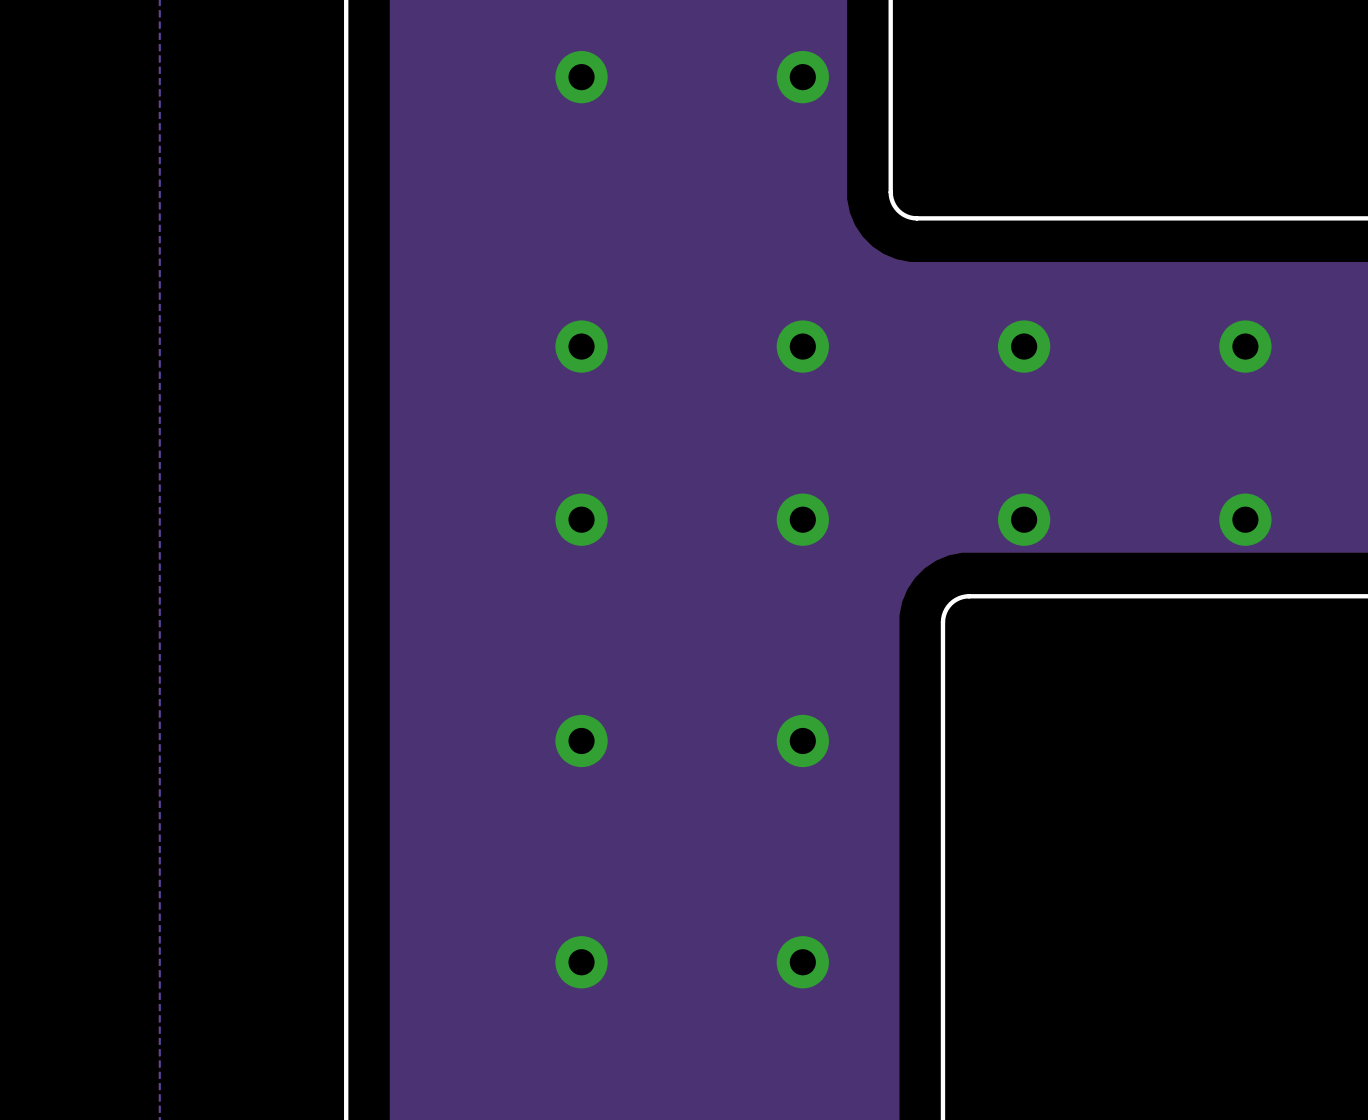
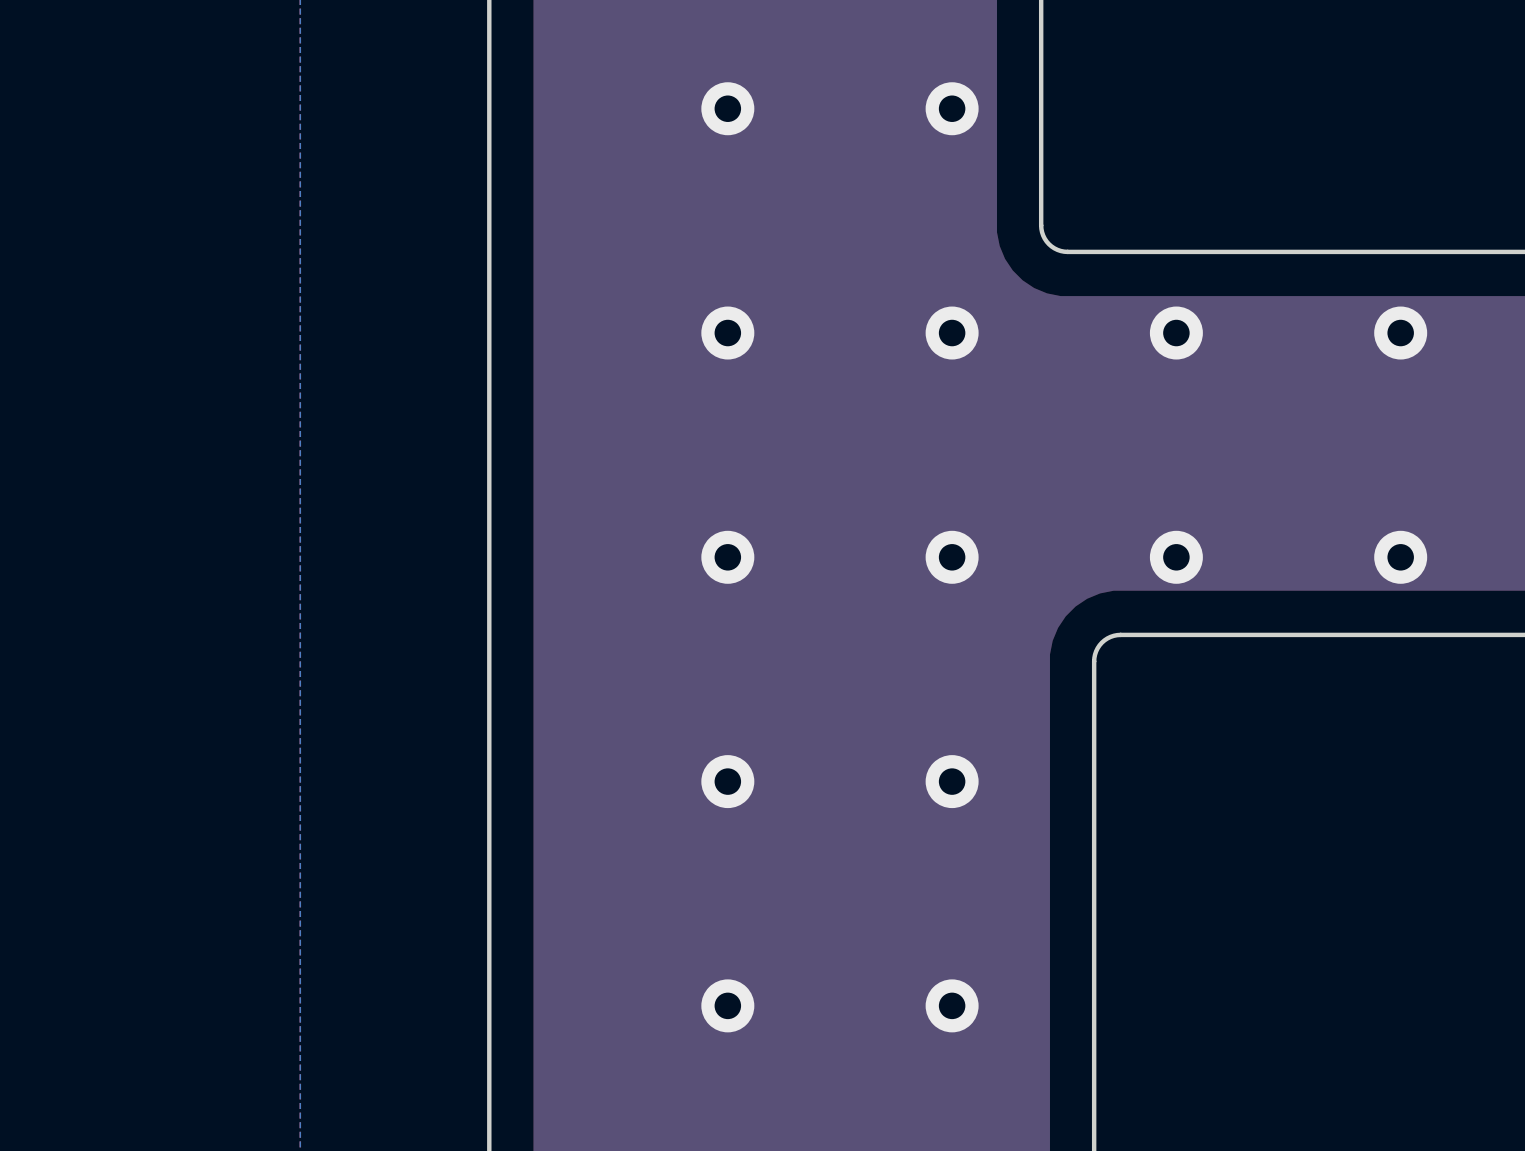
via position: (581, 346) -> (727, 333)
via position: (802, 346) -> (952, 333)
via position: (1024, 346) -> (1176, 333)
via position: (1245, 346) -> (1400, 333)

